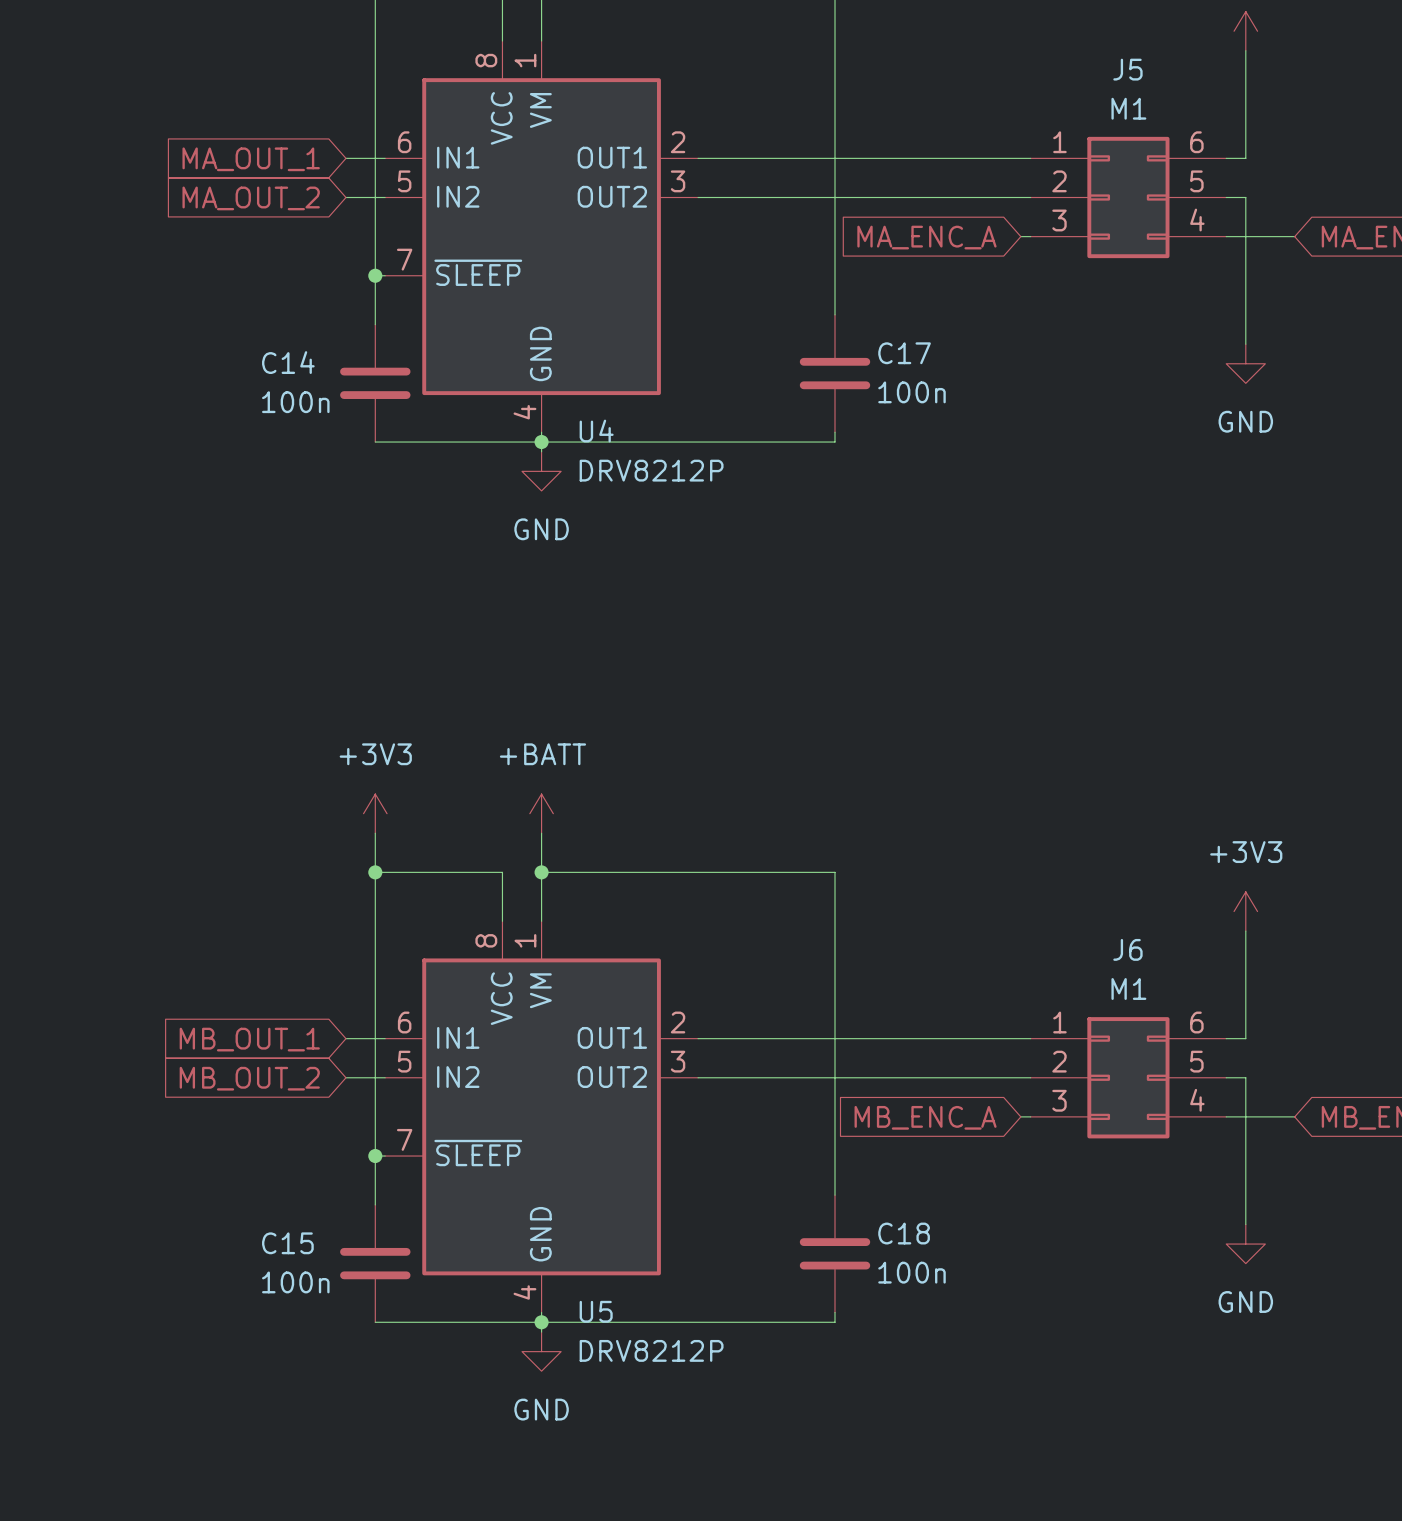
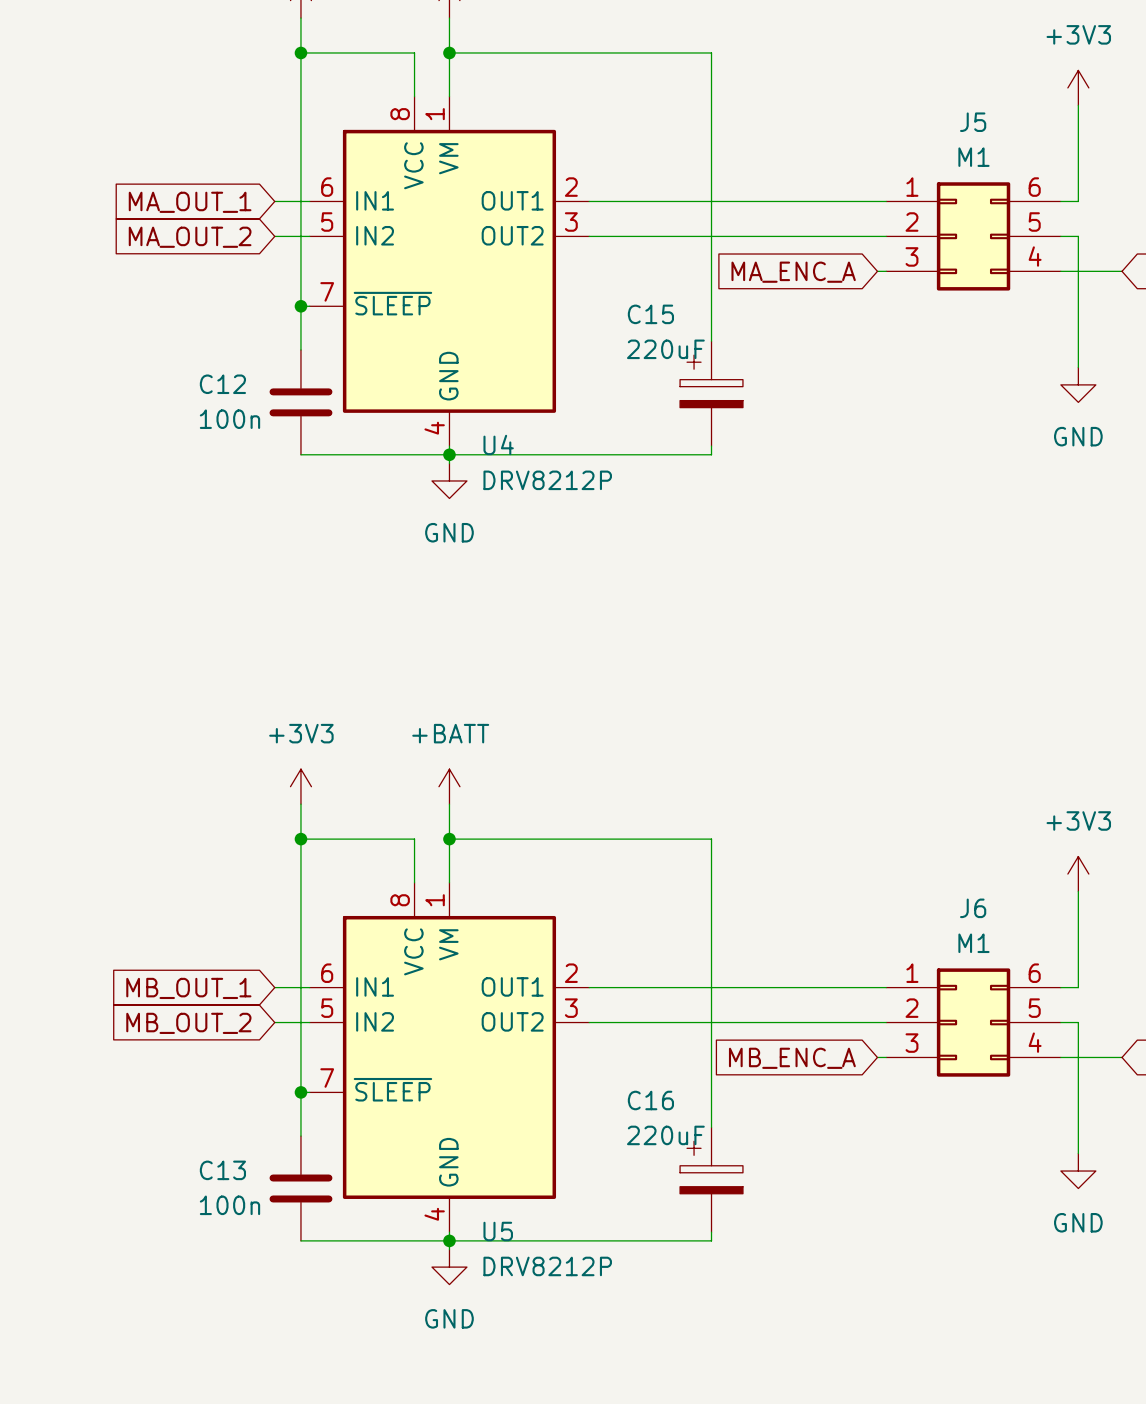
C14 name: C14 (288, 362) -> C12 (222, 384)
C17: 100n (835, 373) -> none
C15: none -> 220uF (711, 393)
C15 name: C15 (287, 1243) -> C13 (222, 1170)
C18: 100n (835, 1253) -> none
C16: none -> 220uF (711, 1179)

